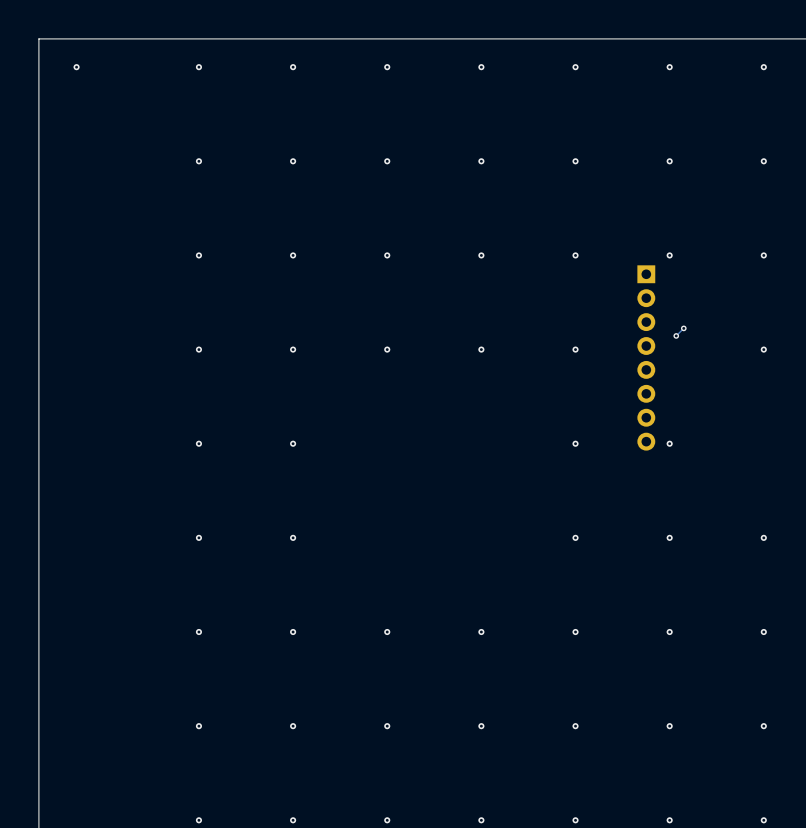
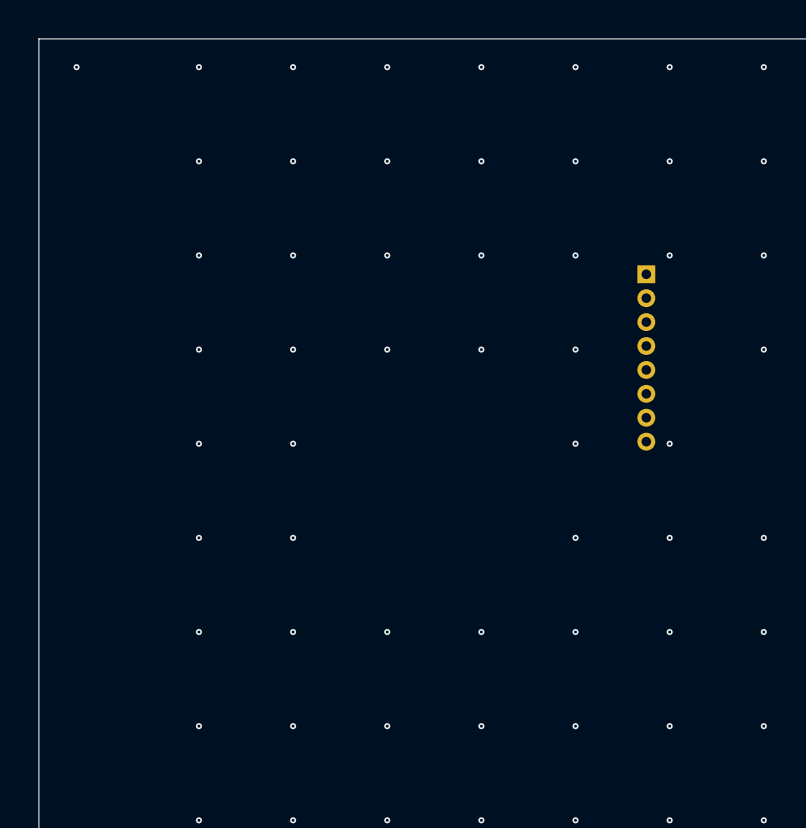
track: (683, 328) (676, 335) -> none
via: (683, 328) -> none
via: (676, 335) -> none

